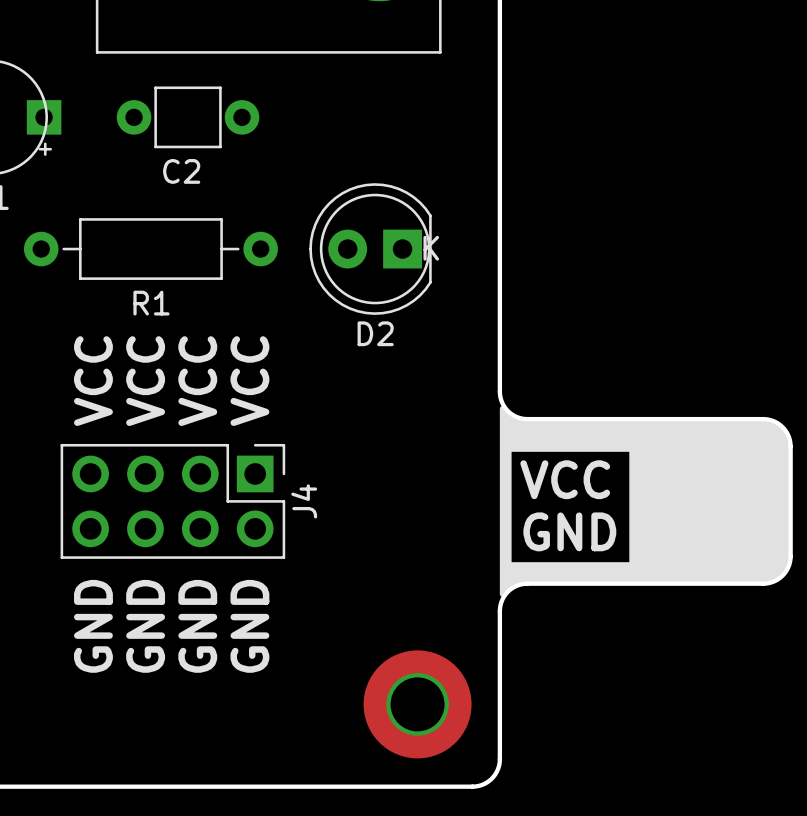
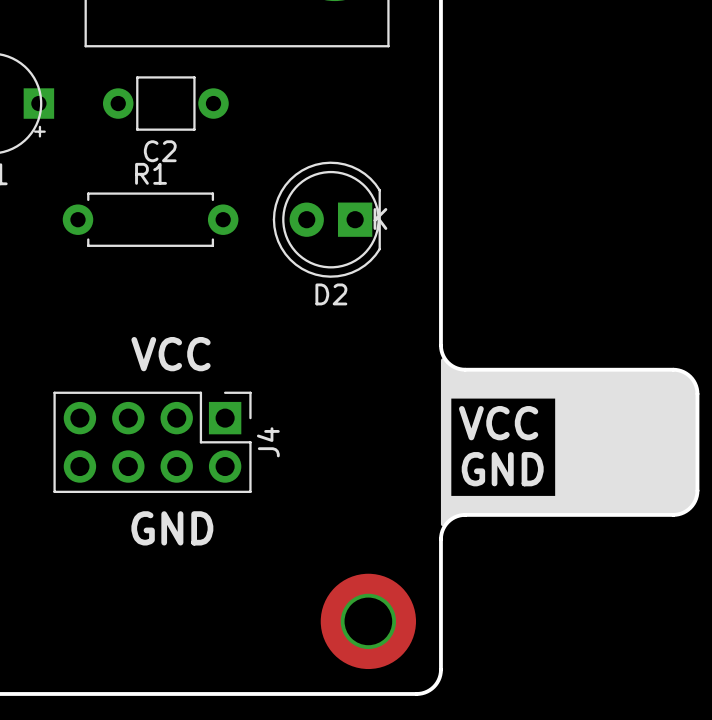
R1 footprint: [23, 218, 278, 280] -> [62, 192, 239, 247]
R1 name position: R1 (151, 303) -> R1 (151, 173)
text: VCC (93, 381) -> none
text: VCC (145, 381) -> none
text: VCC (197, 381) -> none
text: VCC (249, 381) -> none
text: none -> VCC (171, 354)
text: none -> GND (172, 528)
text: GND (93, 626) -> none
text: GND (145, 626) -> none
text: GND (197, 626) -> none
text: GND (249, 626) -> none

